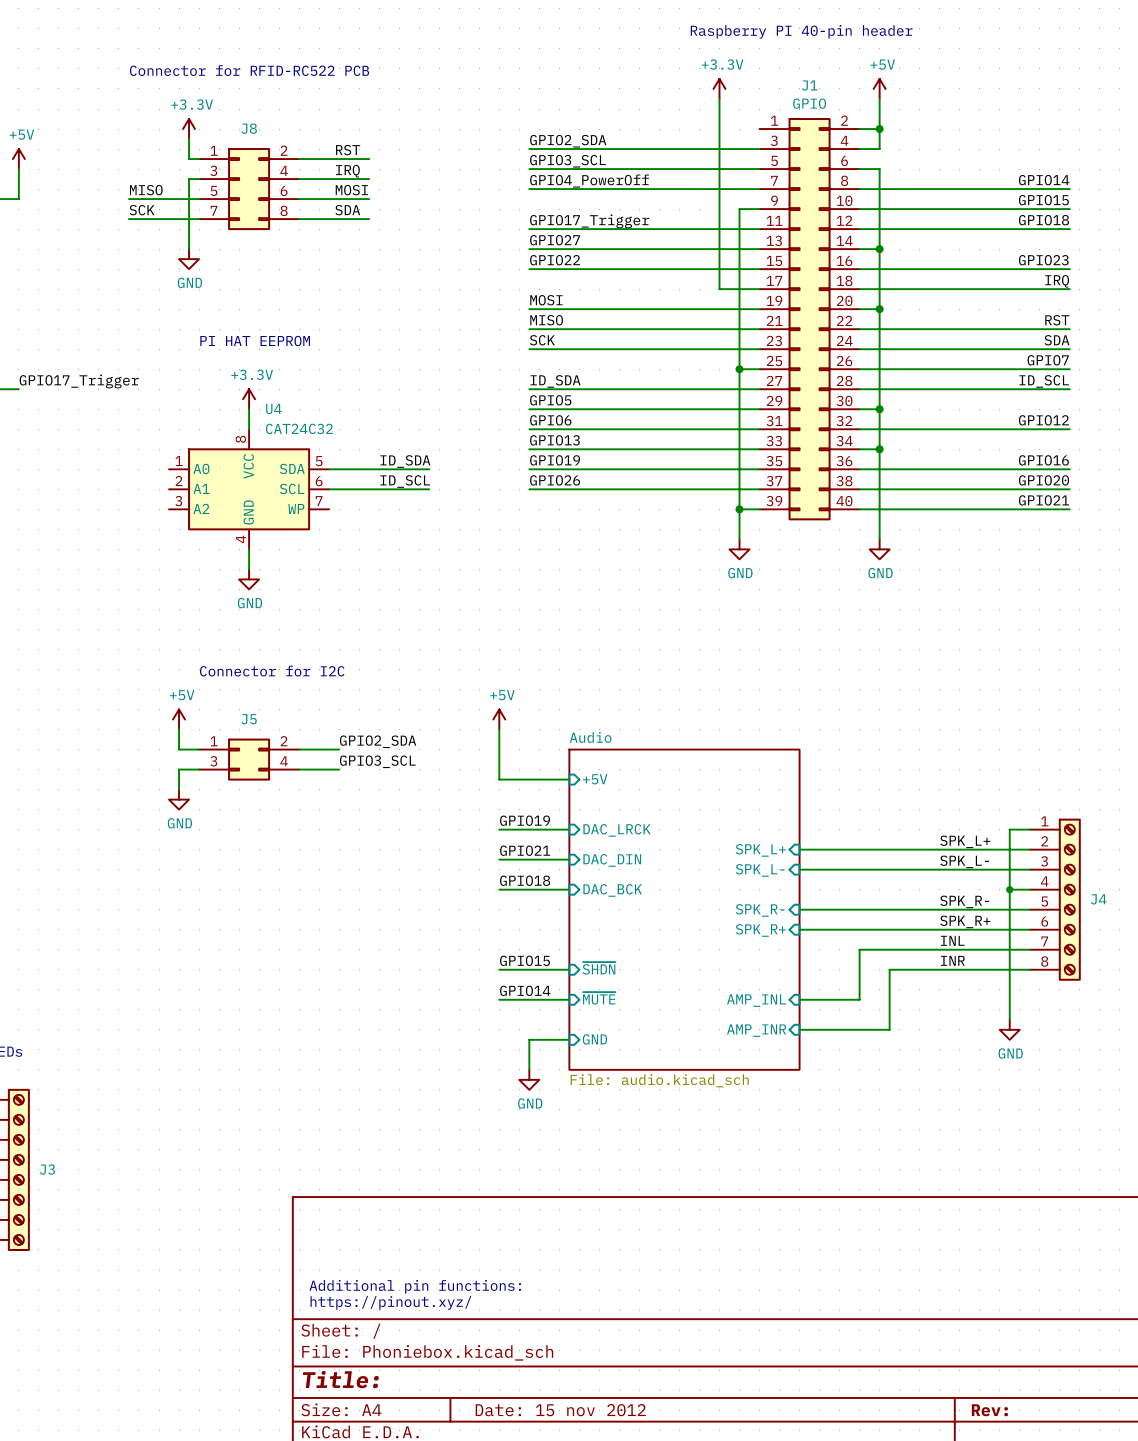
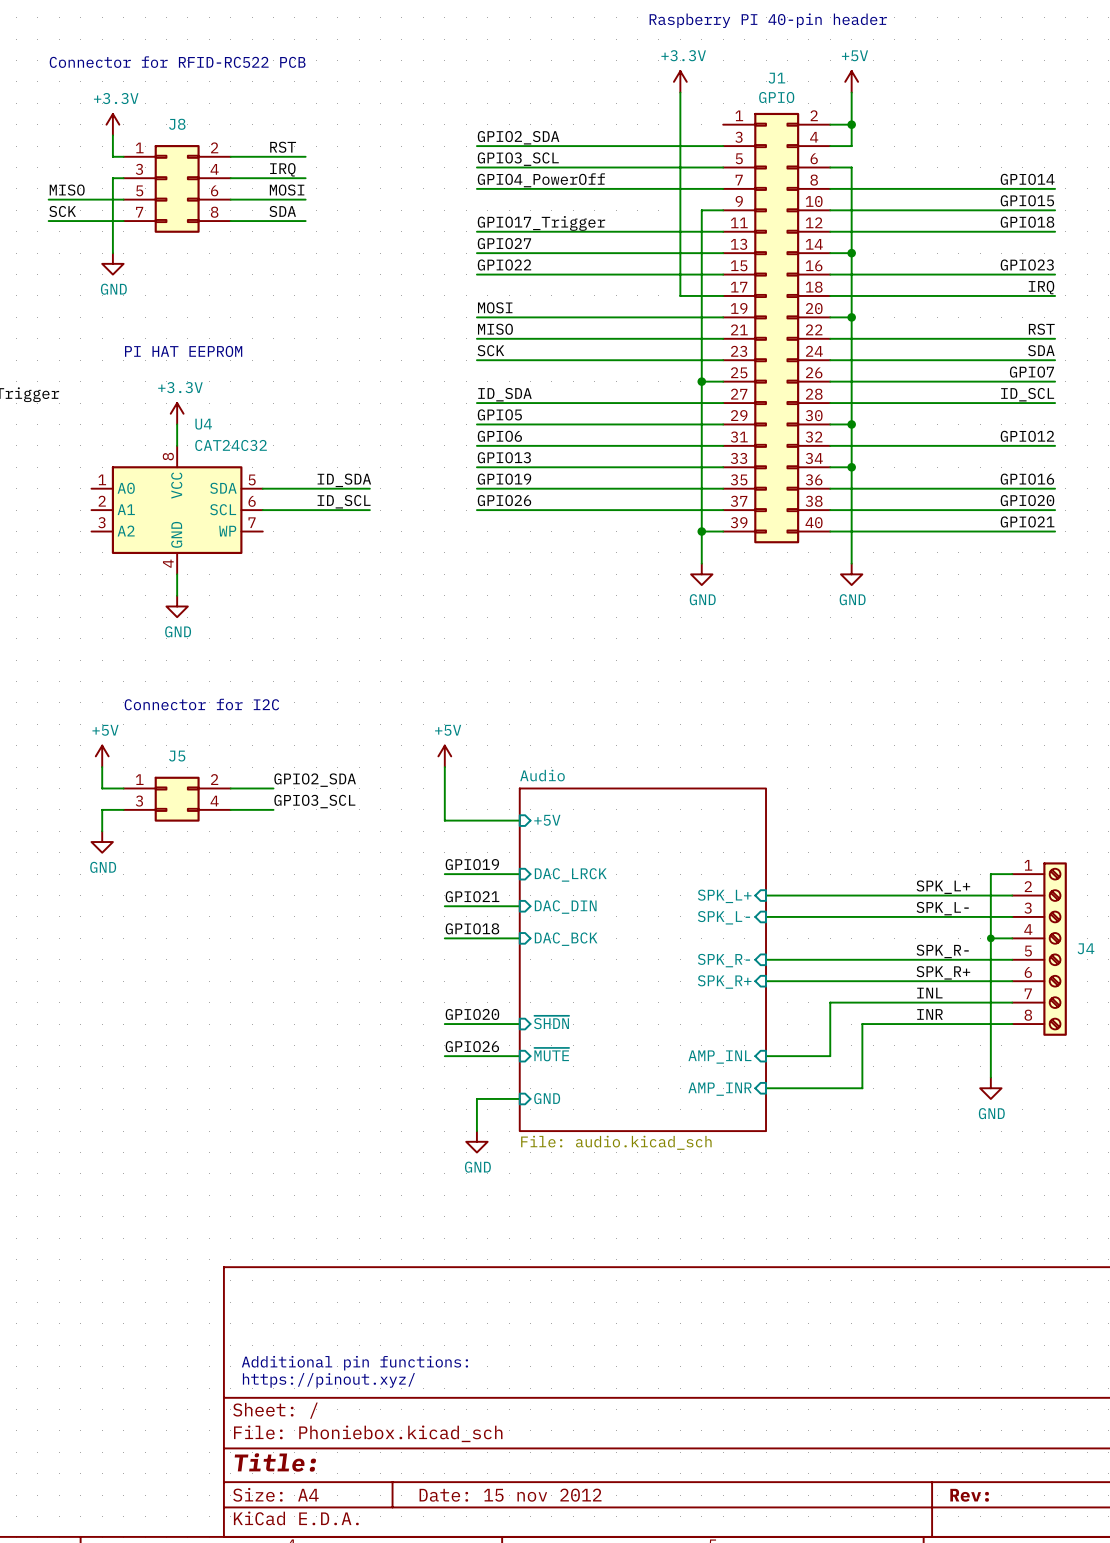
label: GPIO15 (525, 960) -> GPIO20 (472, 1014)
label: GPIO14 (525, 990) -> GPIO26 (472, 1046)

